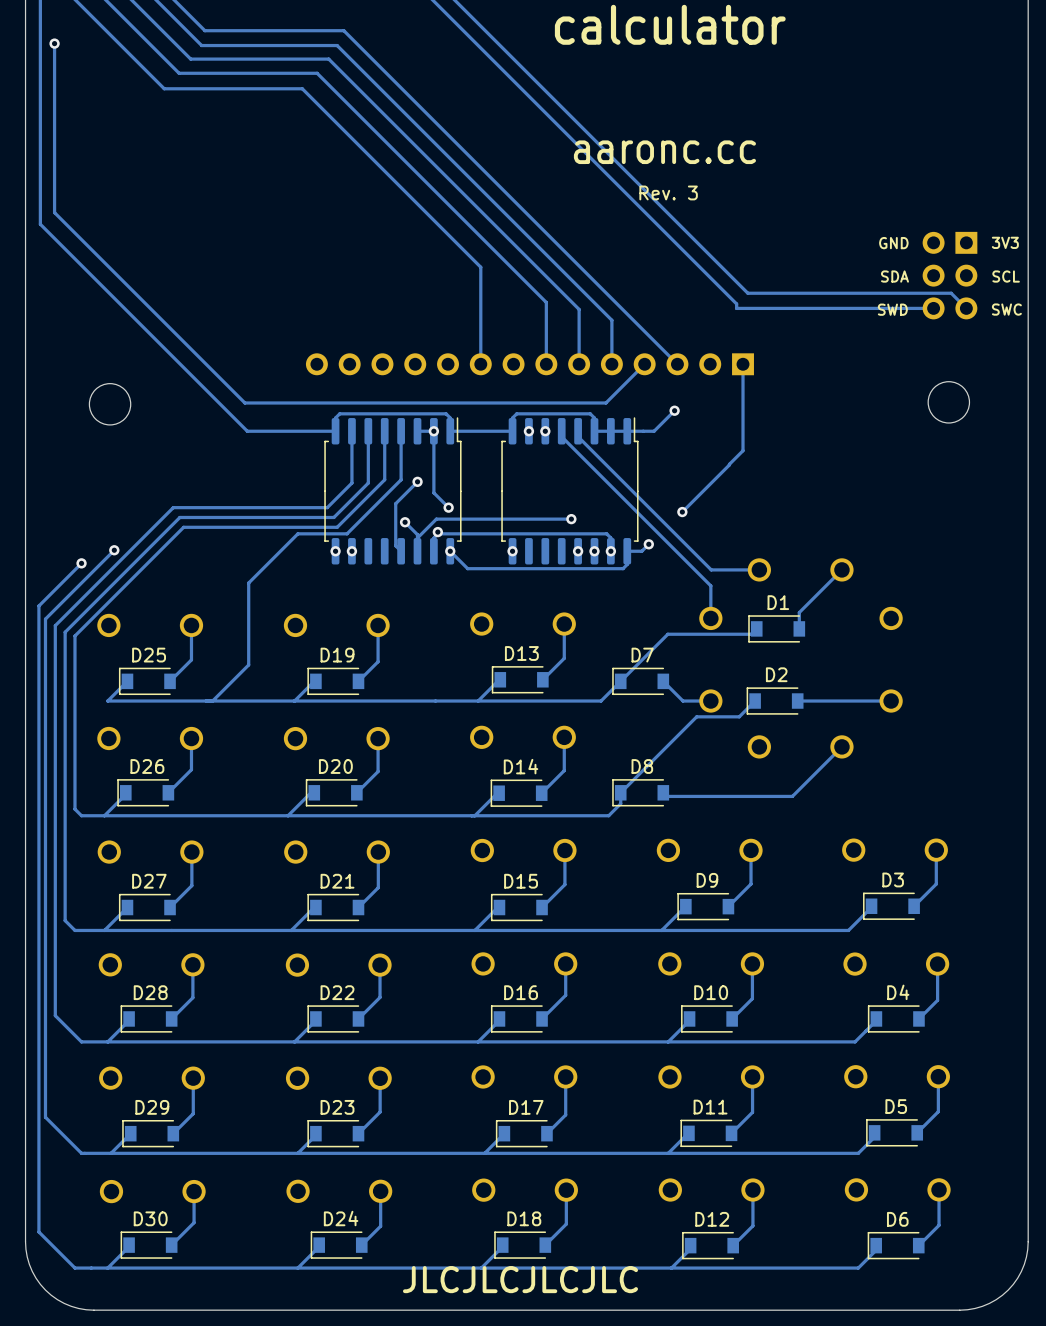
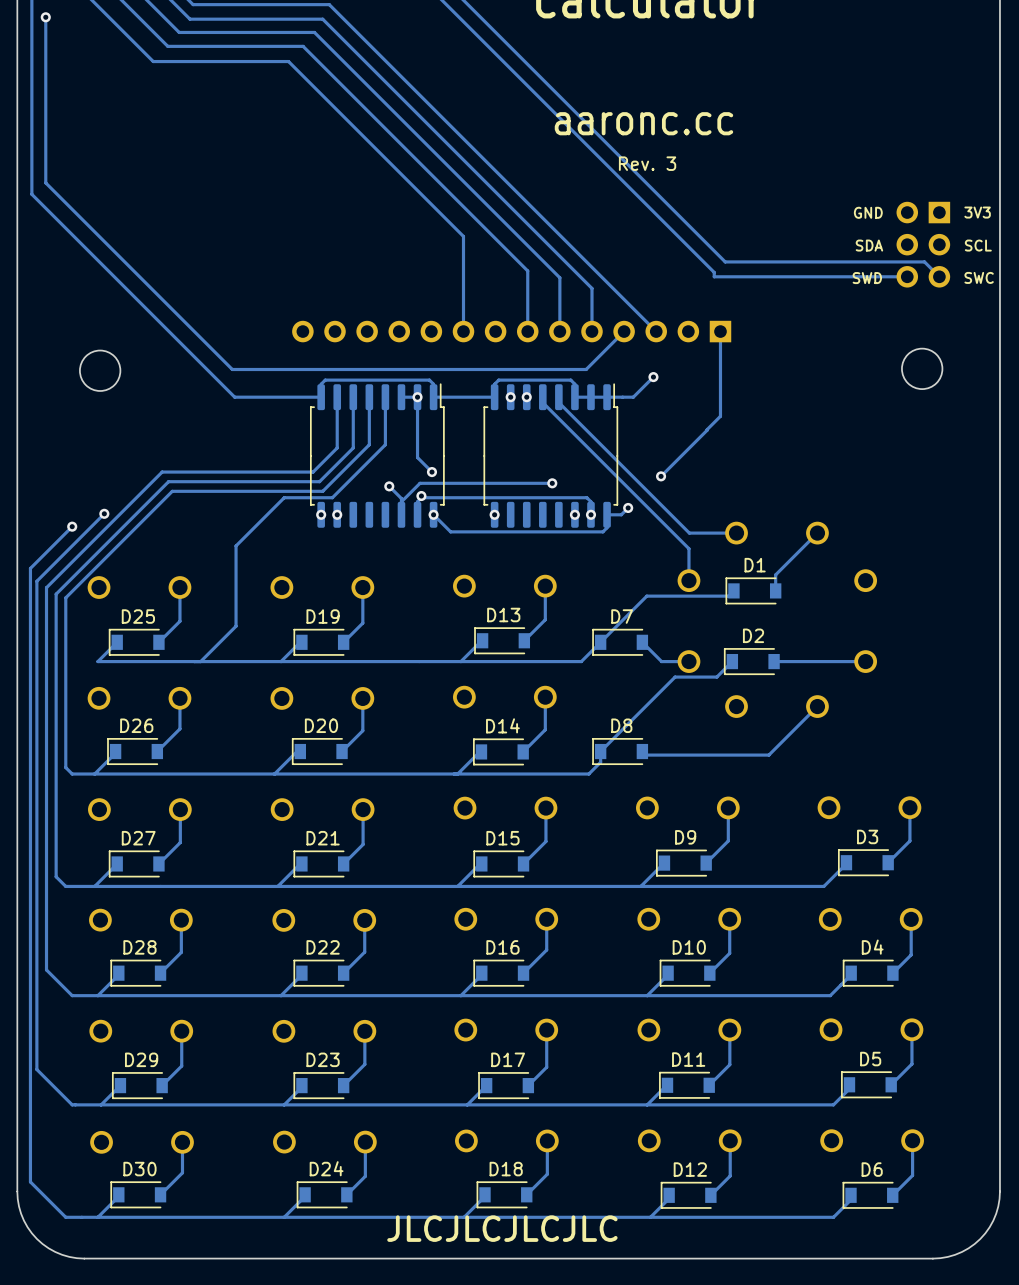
track: (417, 481) (395, 503) (395, 545) (401, 551) -> none
via: (417, 481) -> none
via: (578, 551) -> none

